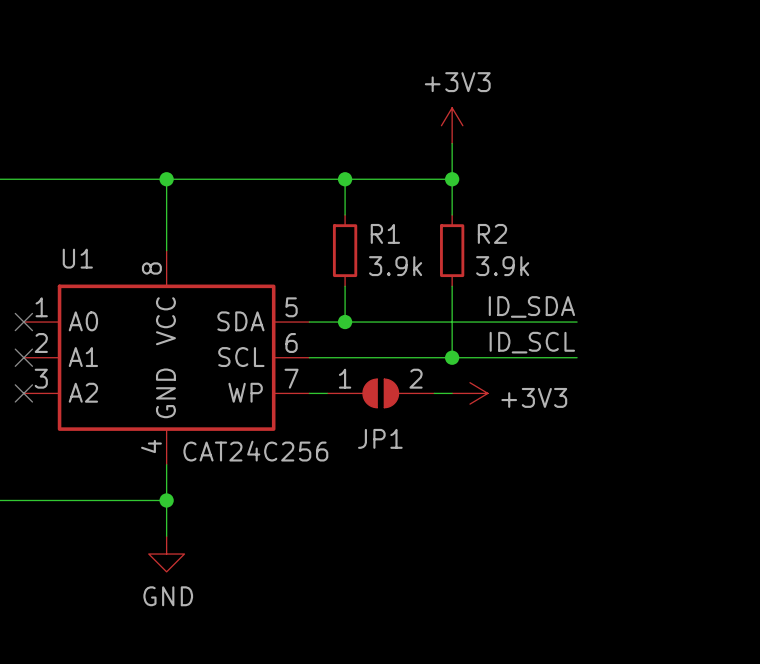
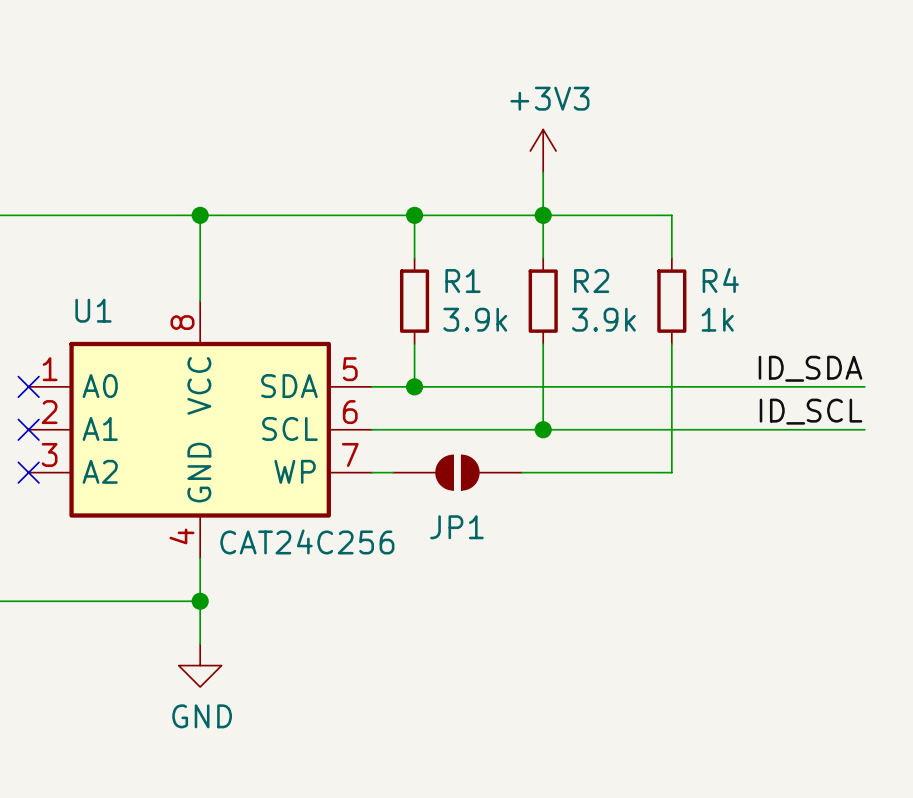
wire: none -> (543, 215) (671, 215) (671, 258)
R4: none -> 1k (671, 301)
wire: none -> (671, 343) (671, 472) (543, 472)
label position: ID_SDA (531, 306) -> ID_SDA (810, 368)
wire: none -> (693, 386) (864, 386)
label position: ID_SCL (532, 342) -> ID_SCL (811, 411)
wire: none -> (693, 429) (864, 429)
JP1 pin number: 1 (345, 378) -> none
JP1 pin number: 2 (416, 378) -> none
power symbol: +3V3 (469, 393) -> none

